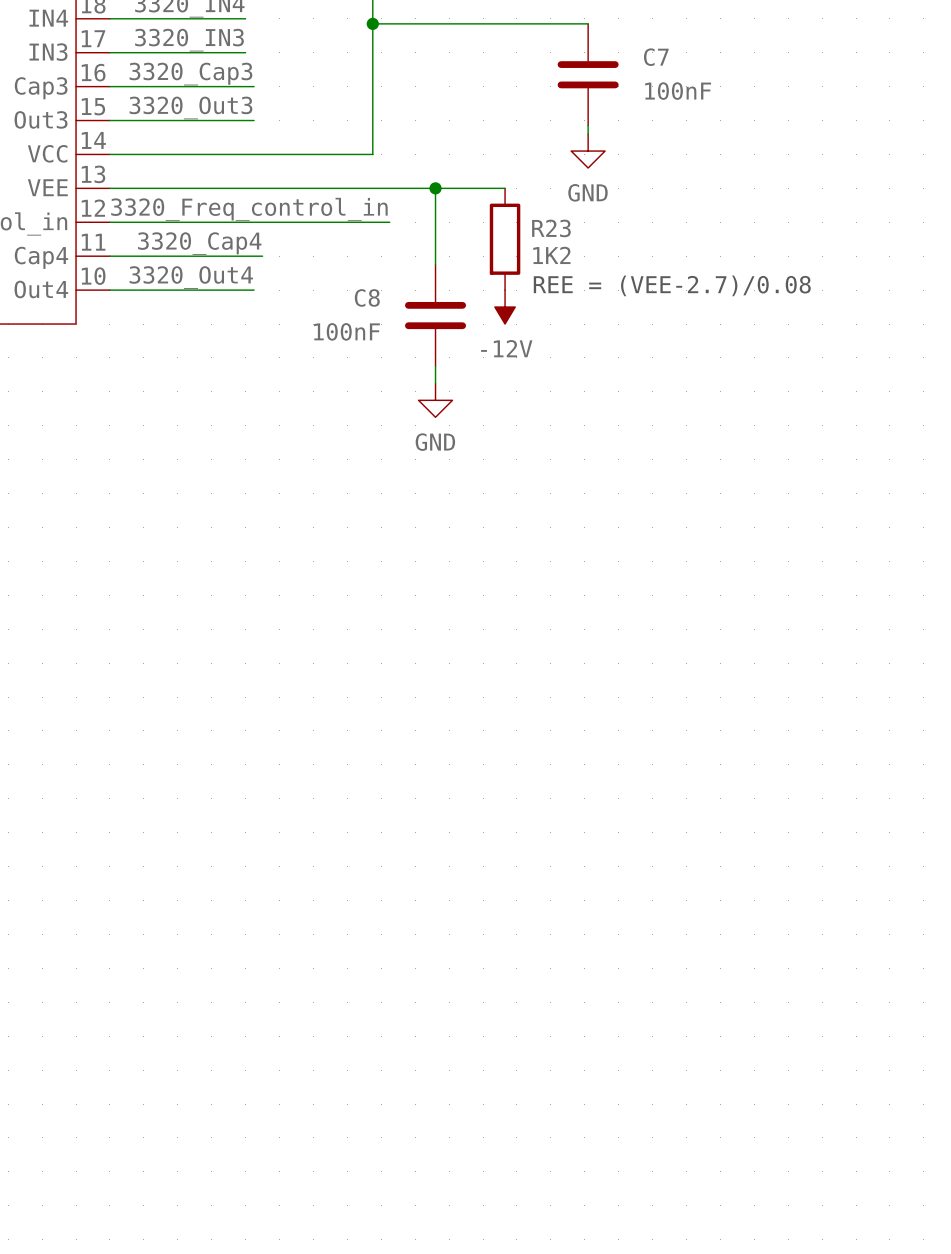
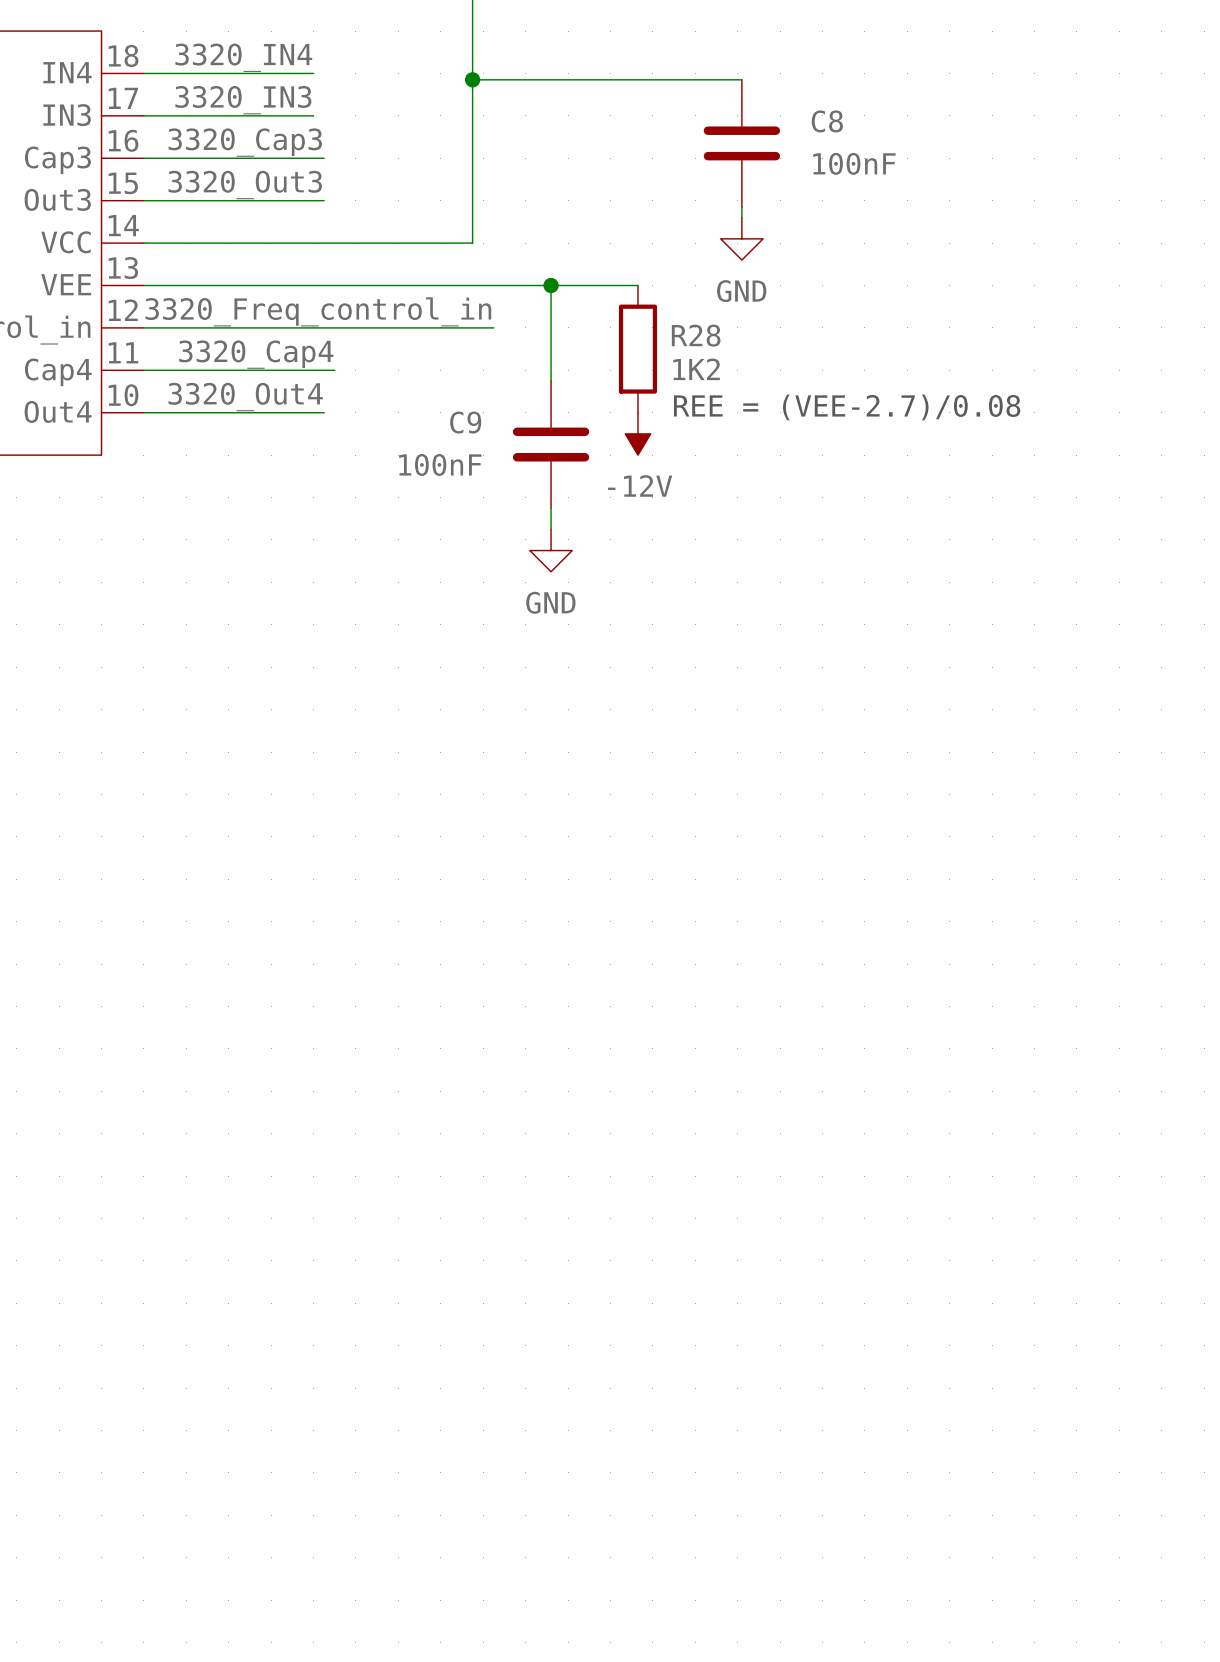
C7 name: C7 (656, 57) -> C8 (827, 121)
R23 name: R23 (551, 228) -> R28 (696, 335)
C8 name: C8 (367, 297) -> C9 (465, 422)

